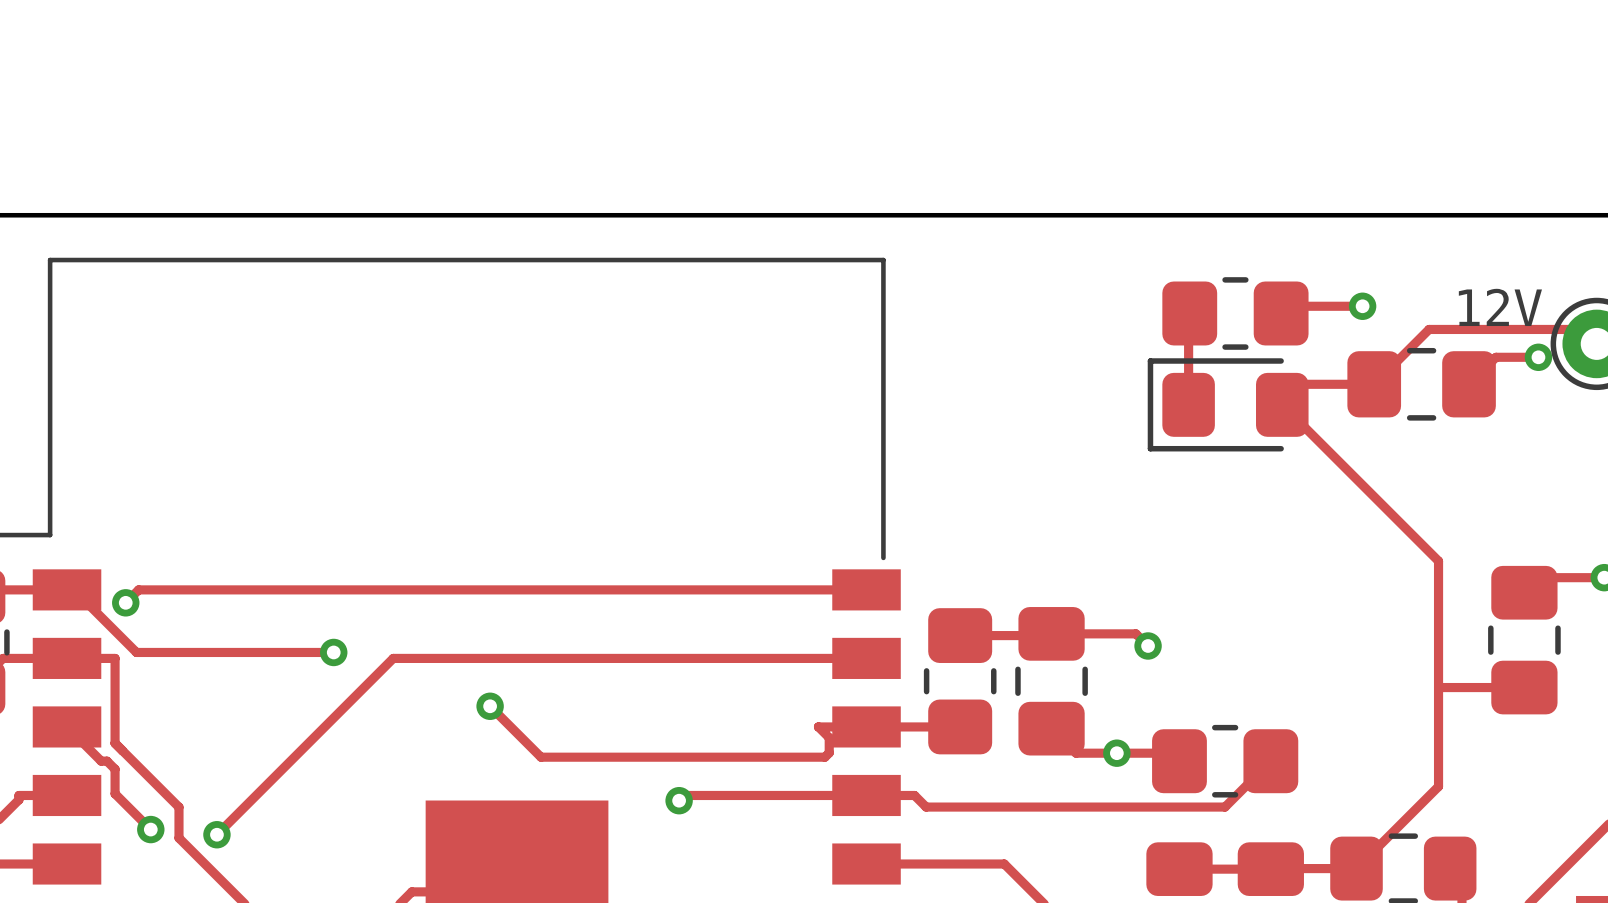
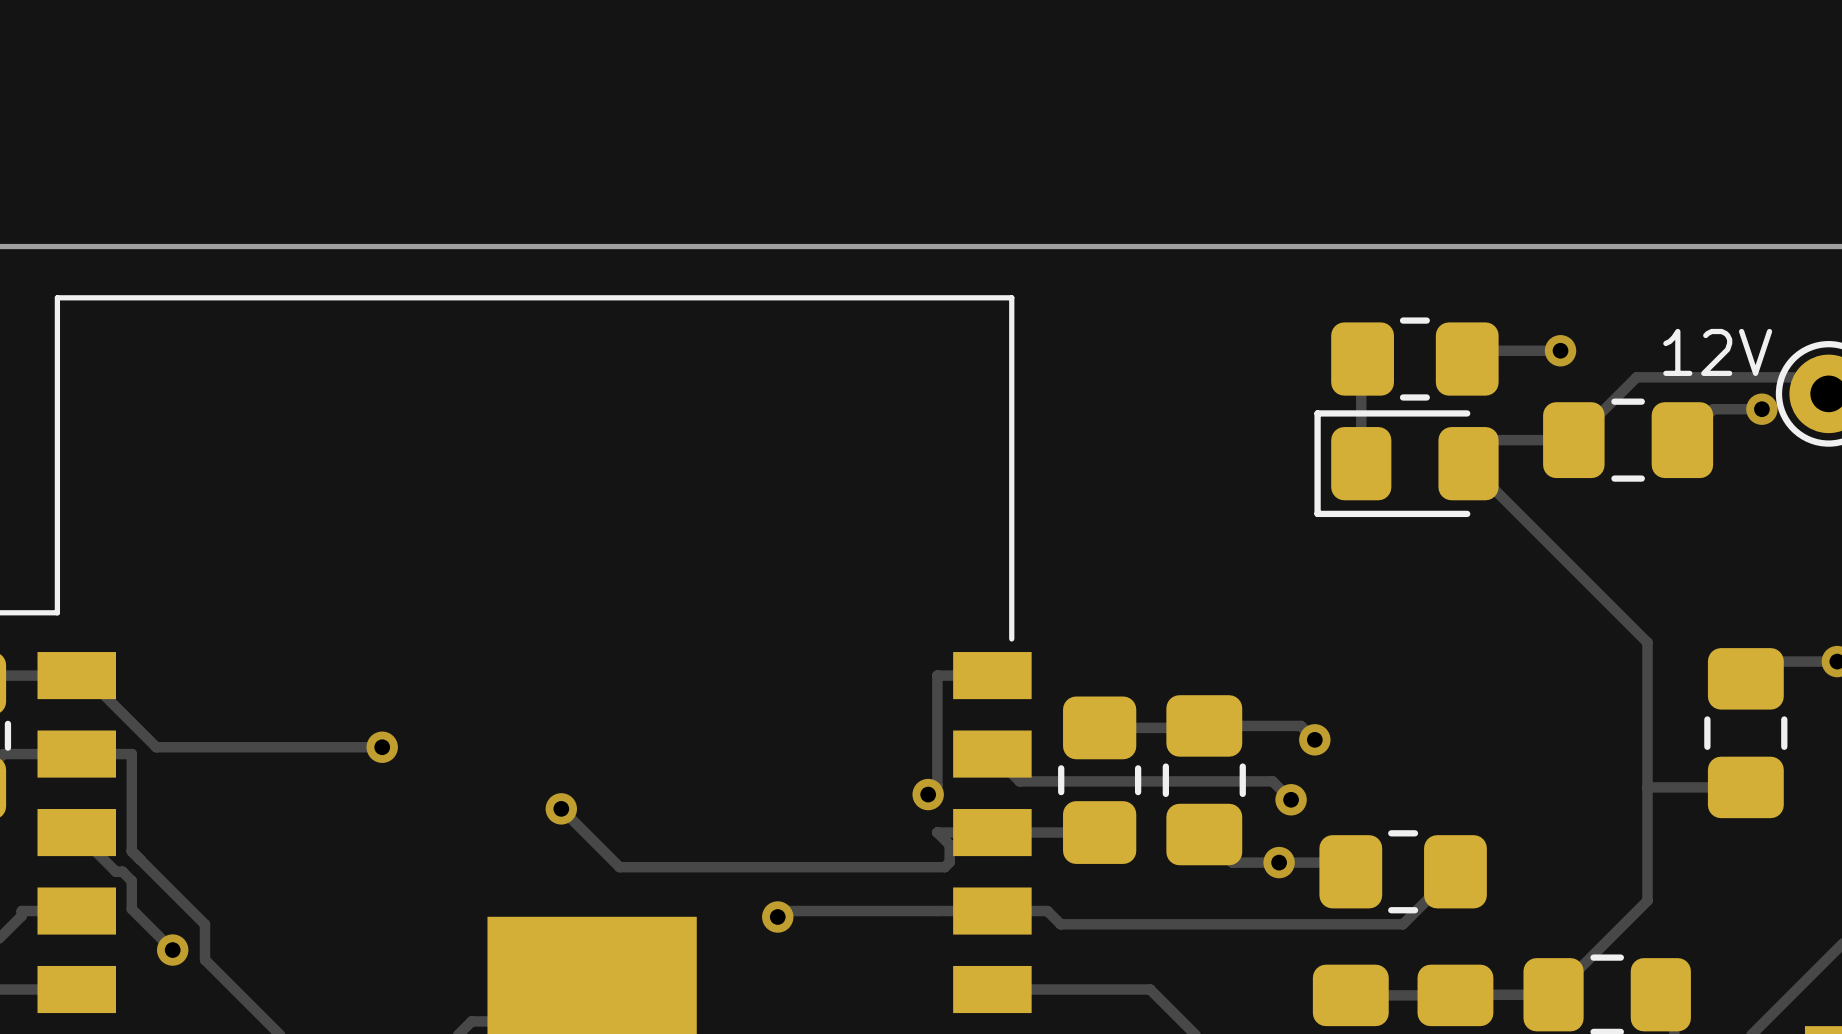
track: (818, 589) (138, 589) (125, 602) -> (937, 675) (937, 785) (928, 794)
via: (125, 602) -> none
track: (866, 658) (393, 658) (216, 834) -> (992, 754) (1019, 781) (1272, 781) (1291, 799)
via: none -> (928, 794)
via: none -> (1291, 799)
via: (216, 834) -> none

